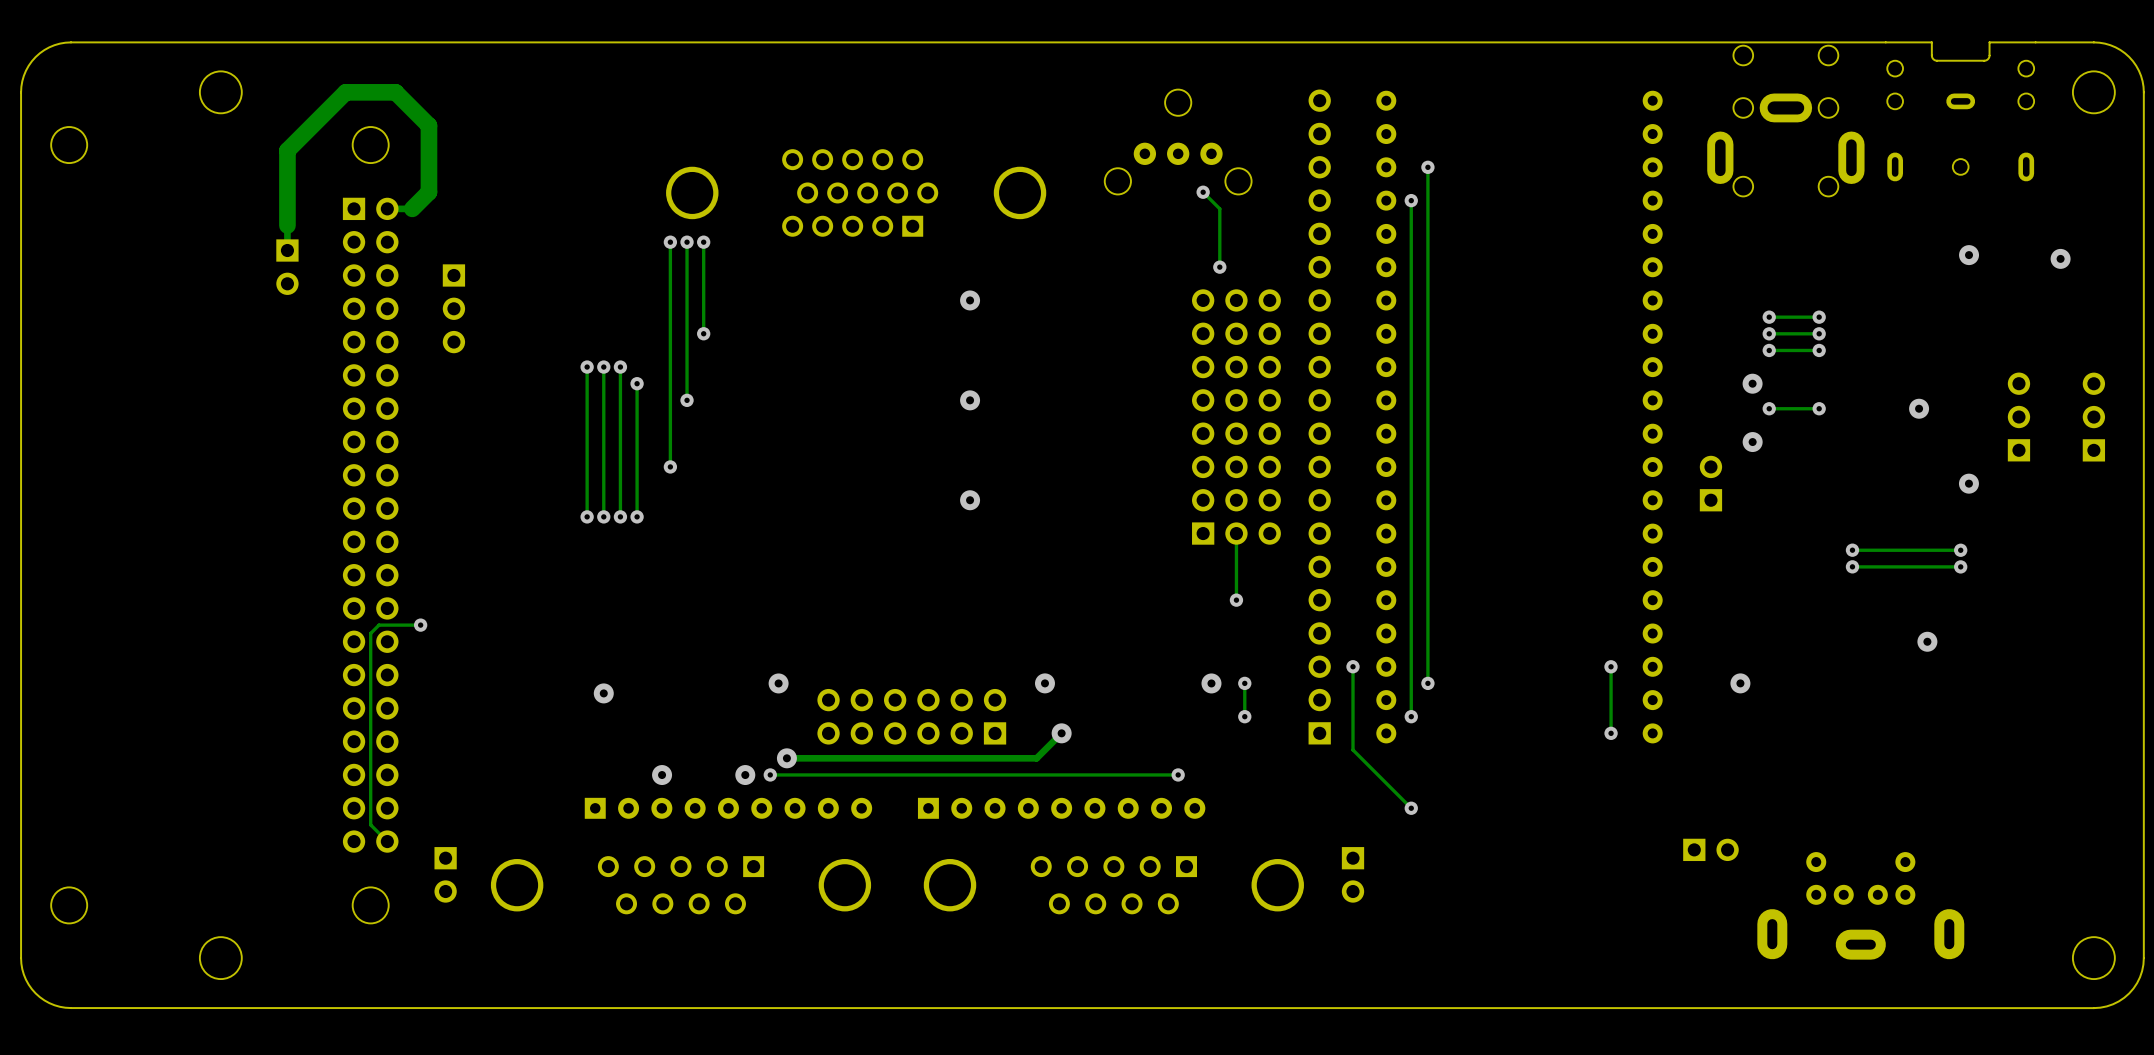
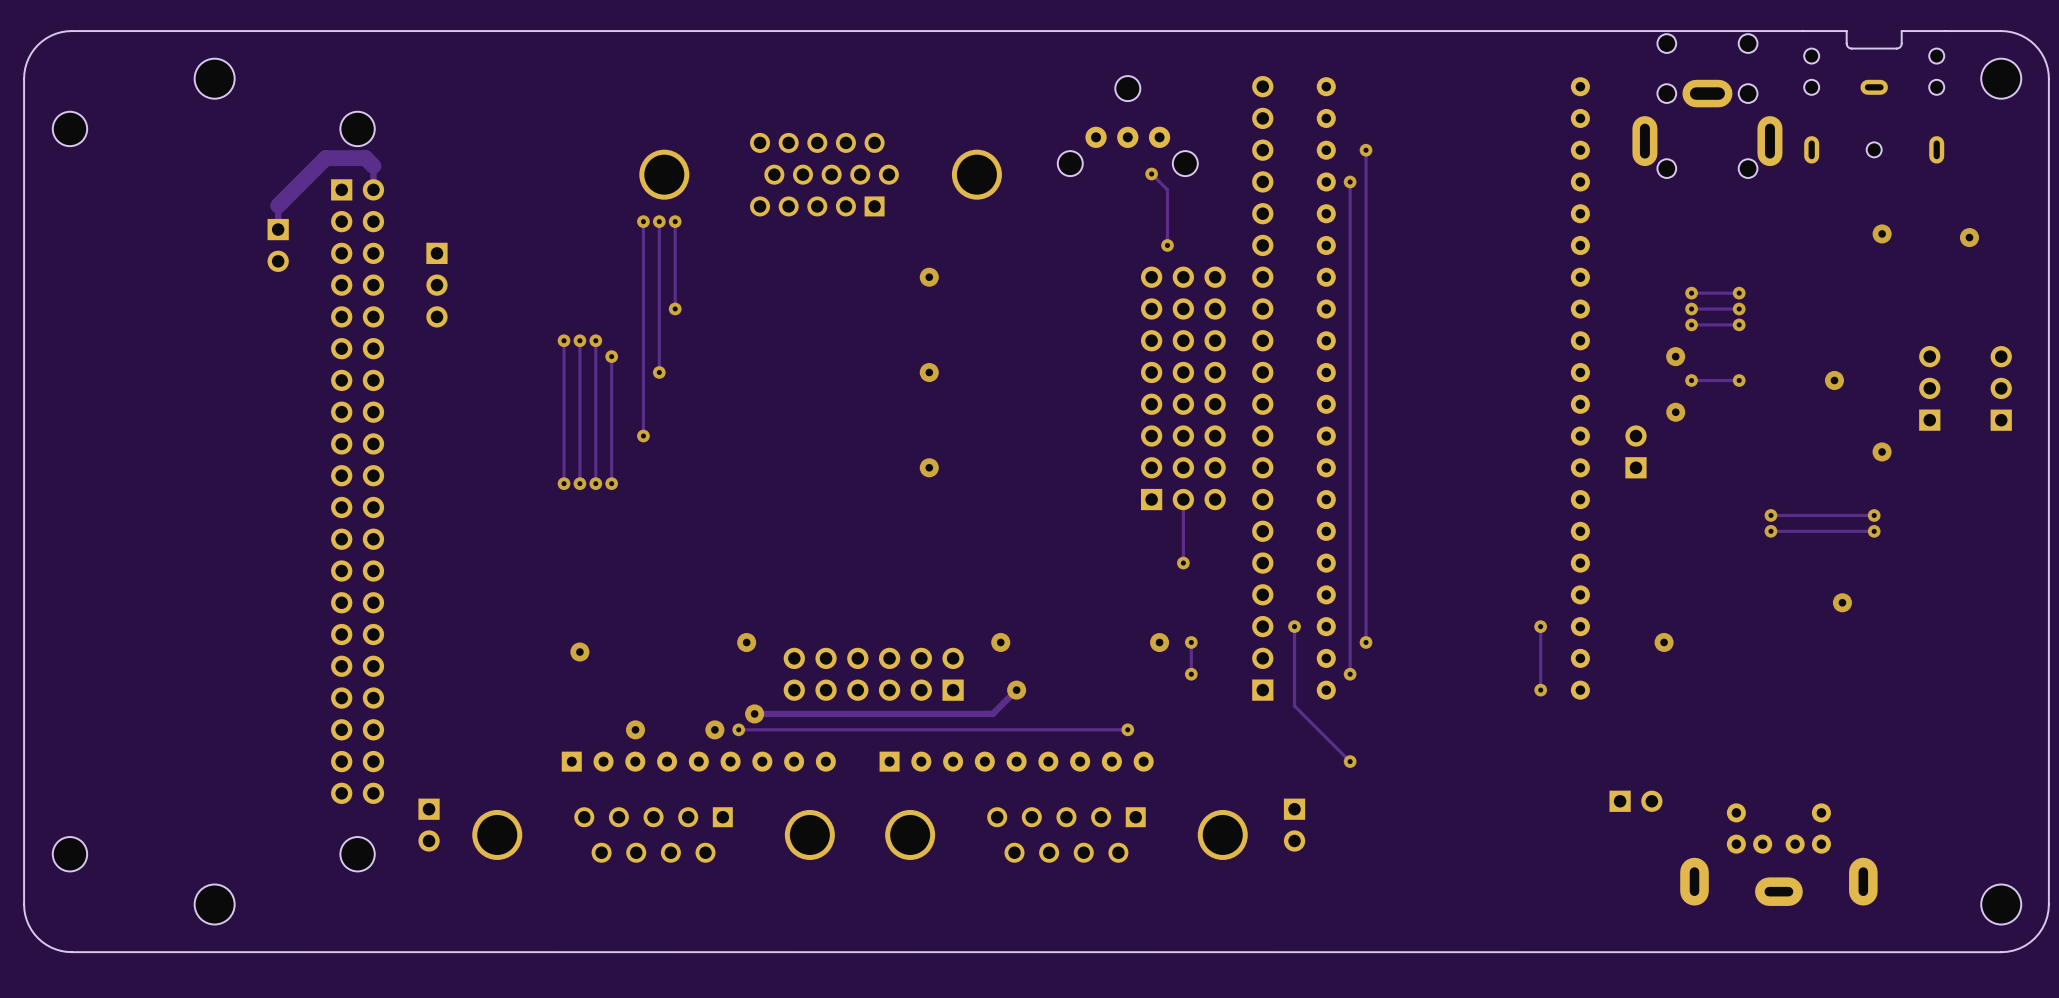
track: (387, 208) (412, 208) (428, 192) (428, 125) (395, 92) (345, 92) (287, 150) (287, 225) -> (373, 189) (373, 166) (365, 158) (325, 158) (278, 205)
track: (420, 625) (379, 625) (370, 633) (370, 824) (387, 841) -> none
via: (420, 625) -> none

